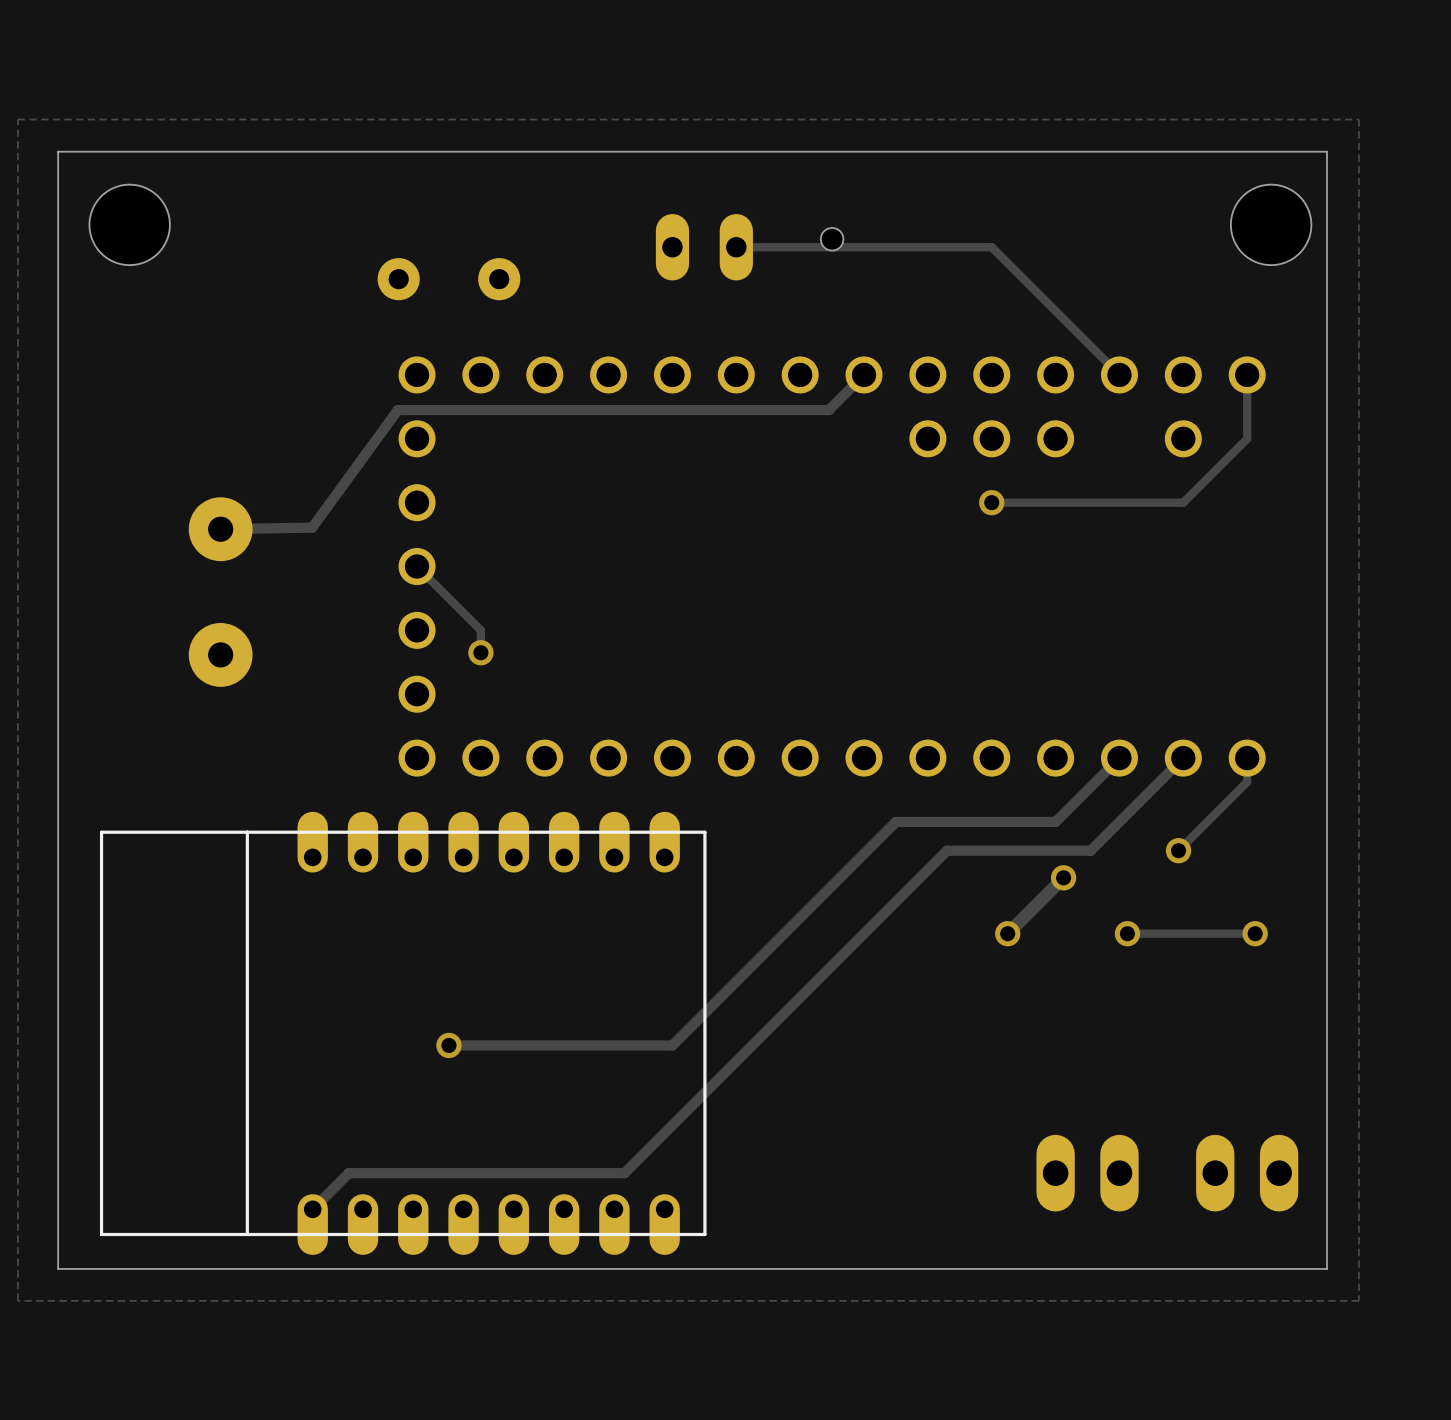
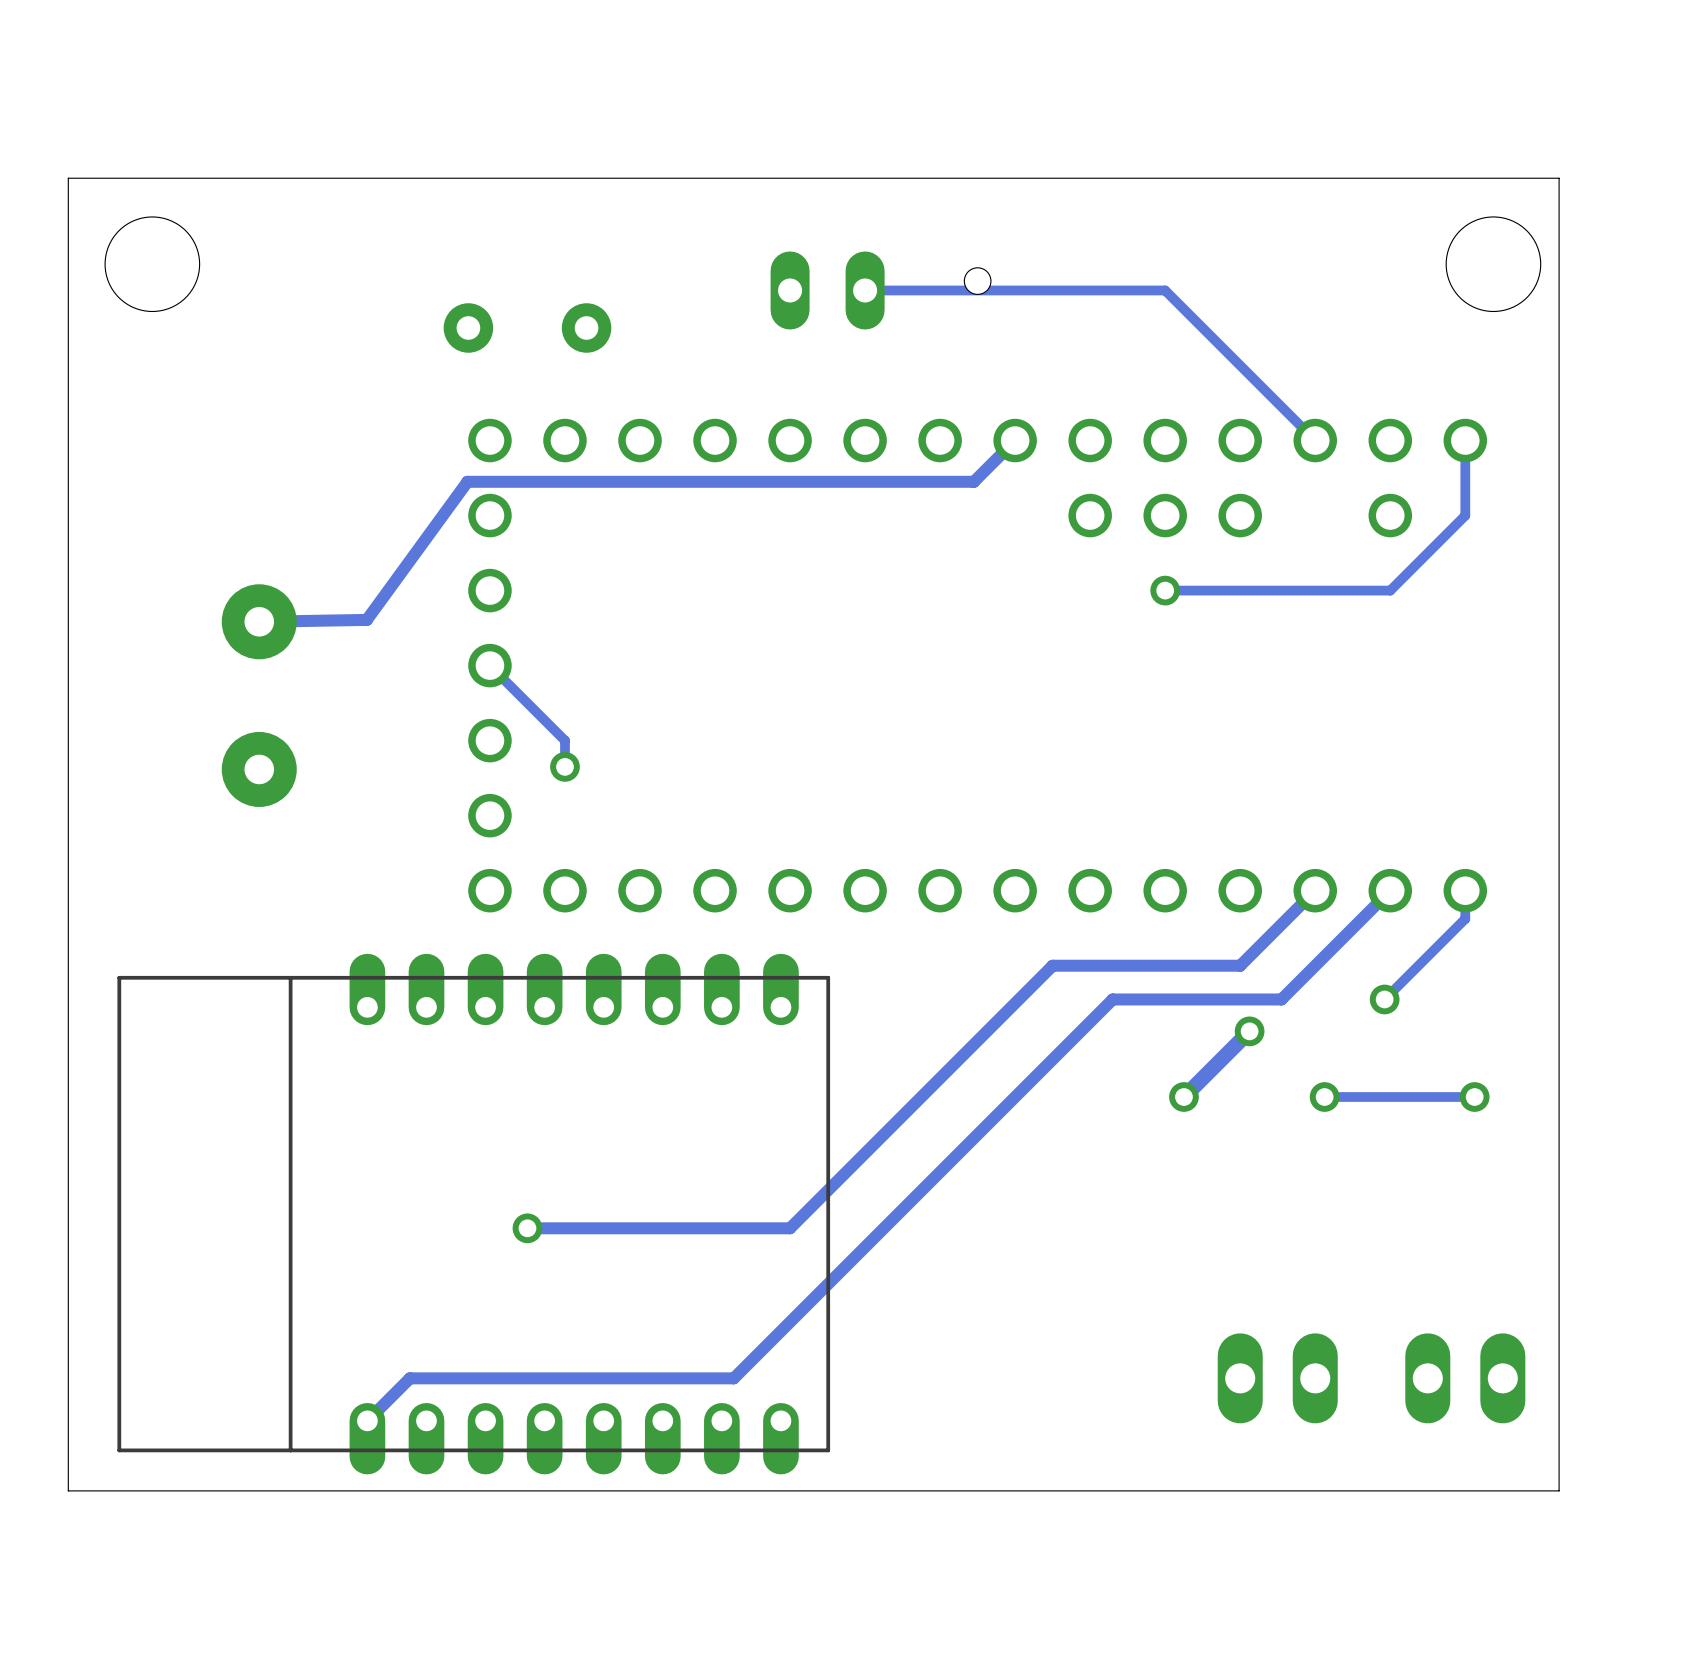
zone outline: (1358, 119) (17, 119) (17, 1300) (1358, 1300) (1358, 119) -> none

